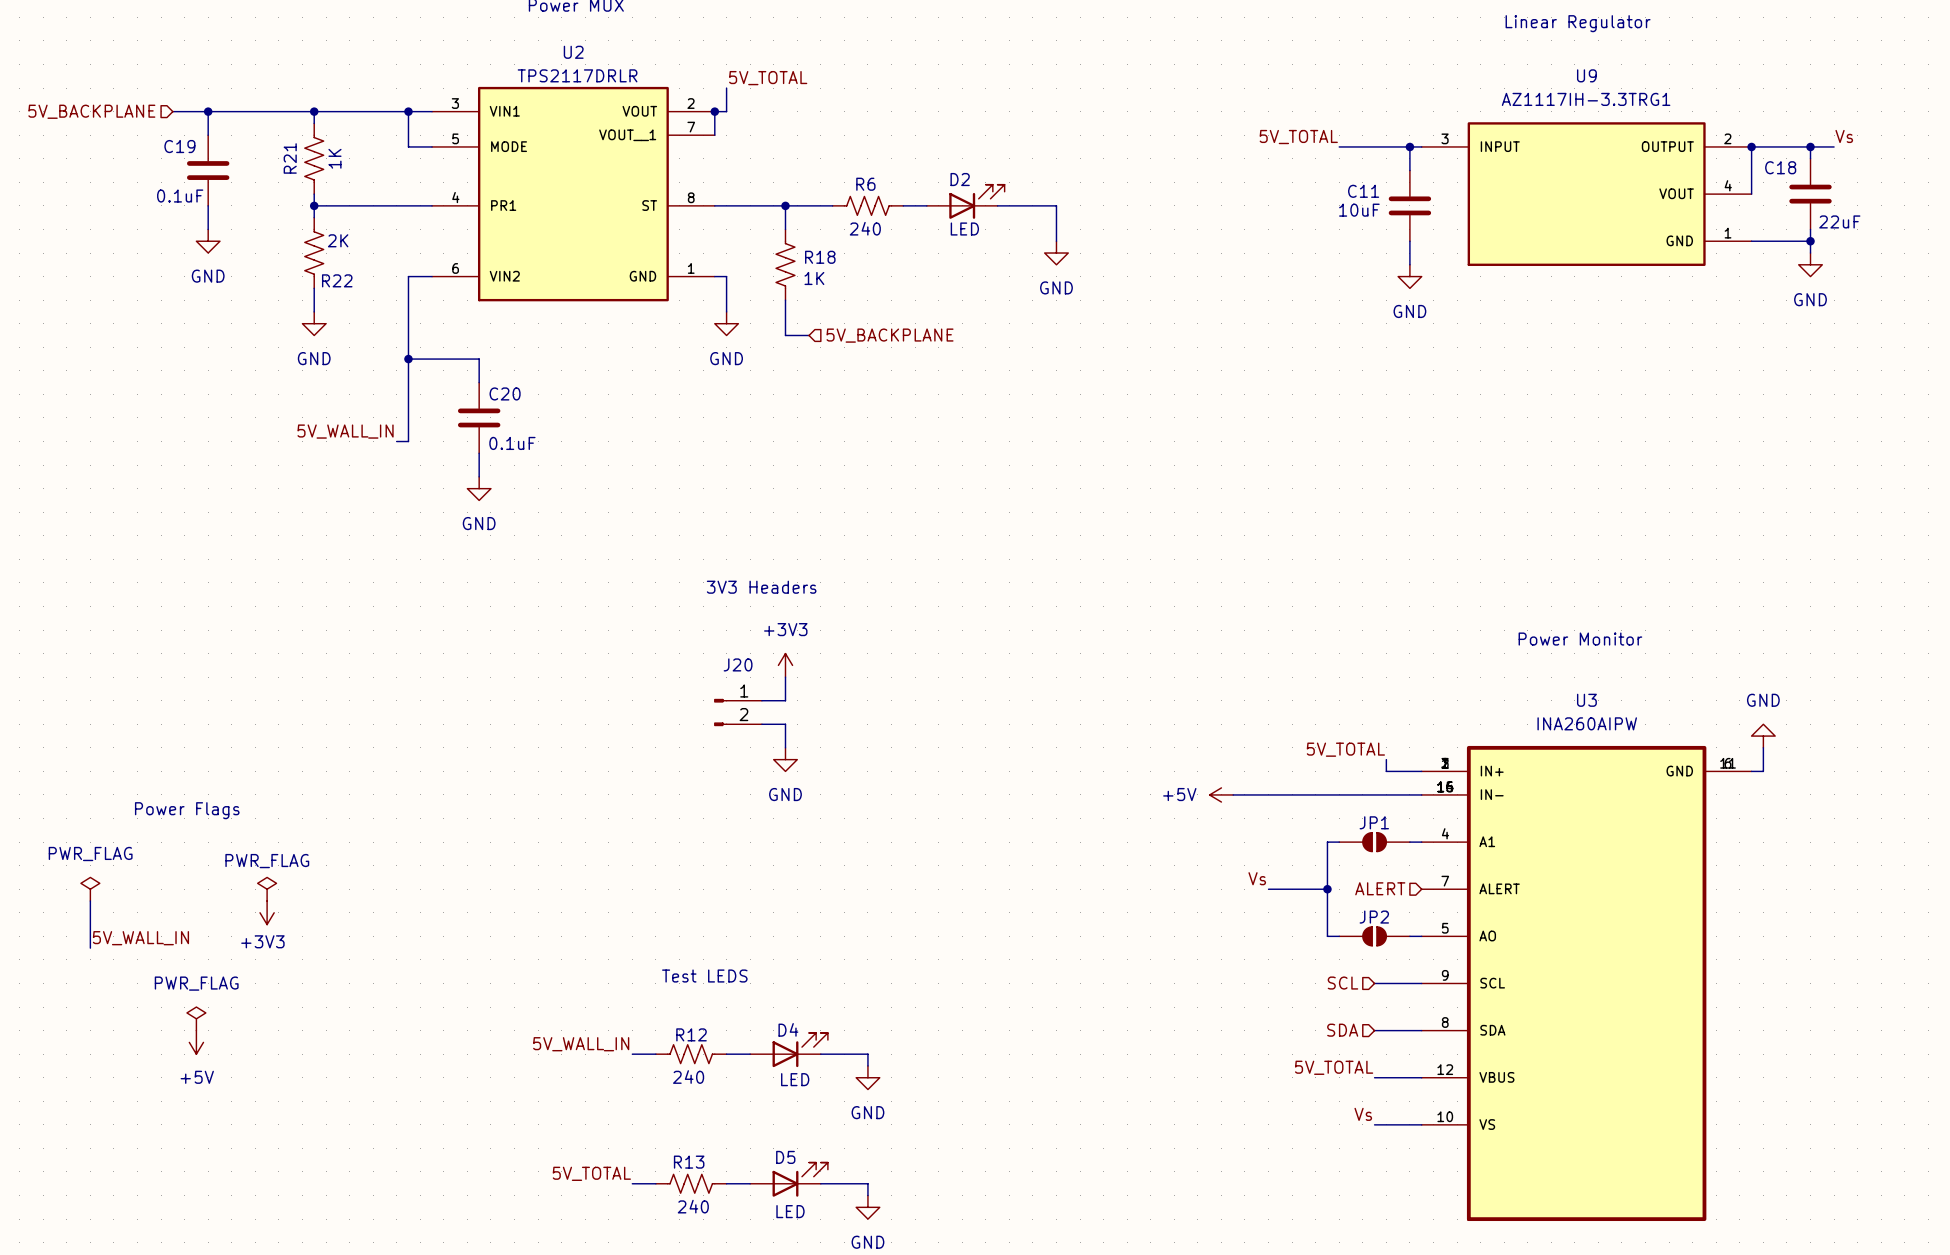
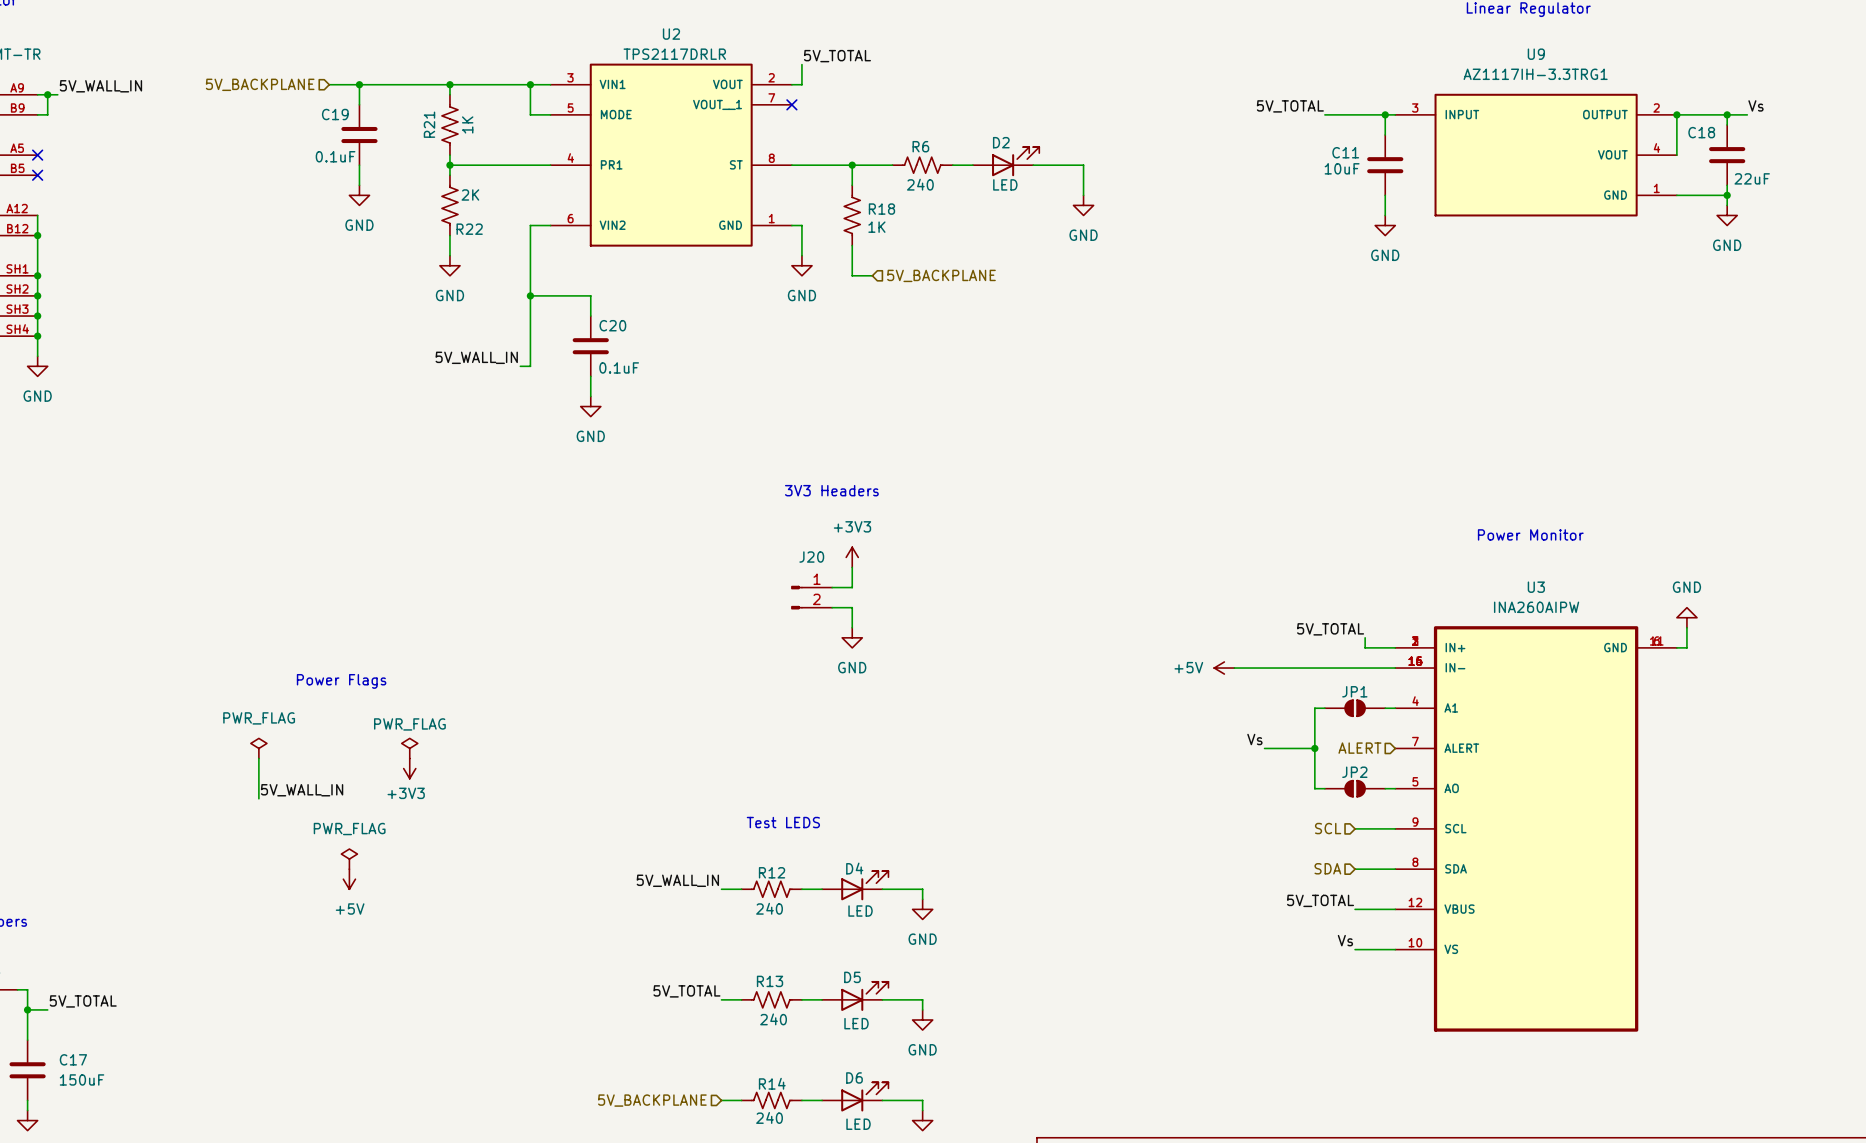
wire: (714, 111) (714, 135) -> none
junction: (714, 111) -> none
no-connect mark: none -> (791, 104)

